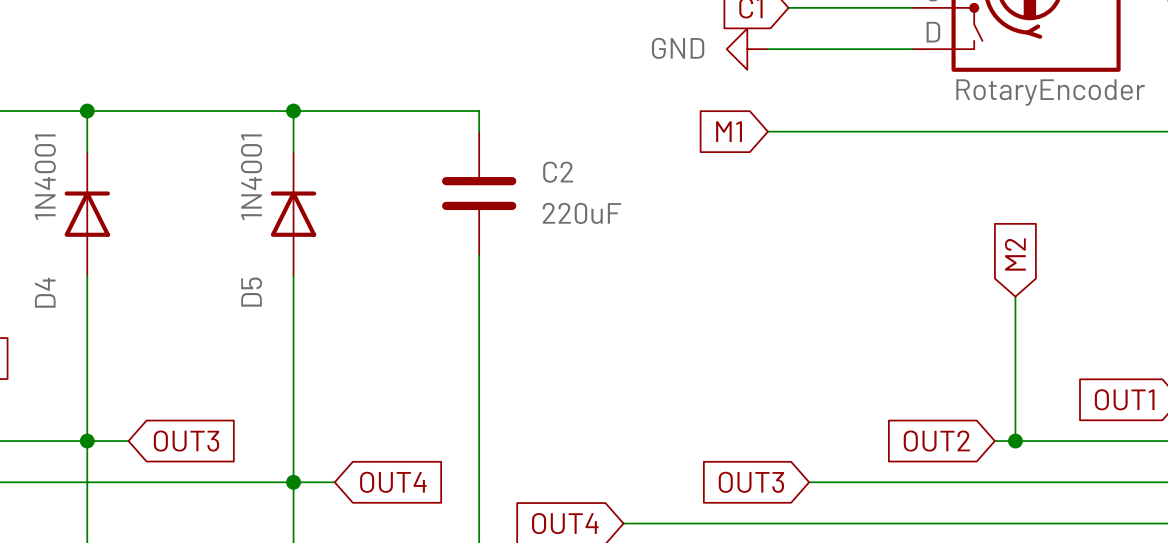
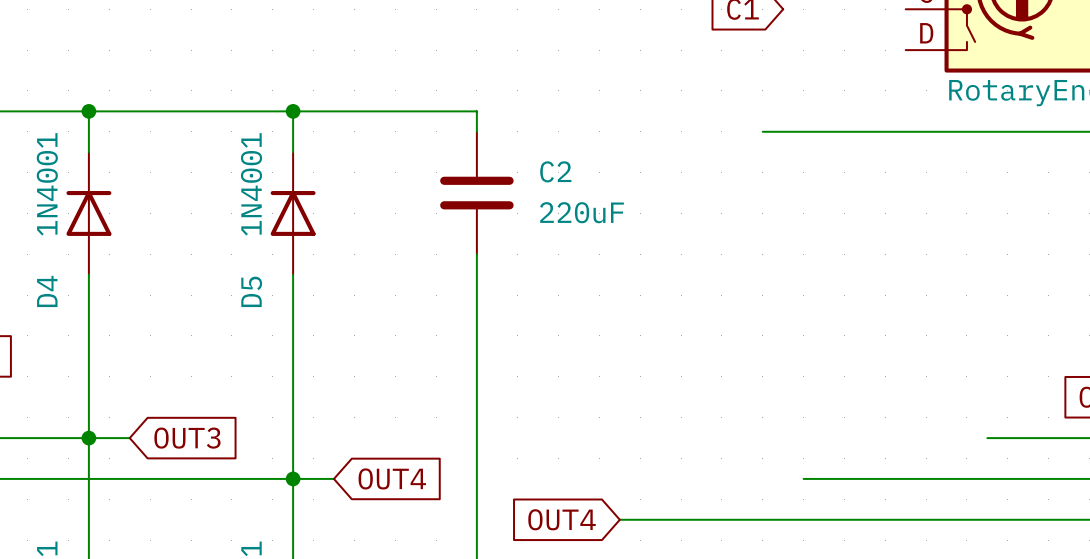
wire: (788, 7) (912, 7) -> none
power symbol: GND (747, 49) -> none
wire: (767, 49) (912, 49) -> none
global label: M1 (729, 131) -> none
global label: M2 (1015, 254) -> none
wire: (1015, 296) (1015, 441) -> none
global label: OUT2 (936, 441) -> none
junction: (1015, 441) -> none
global label: OUT3 (751, 482) -> none

